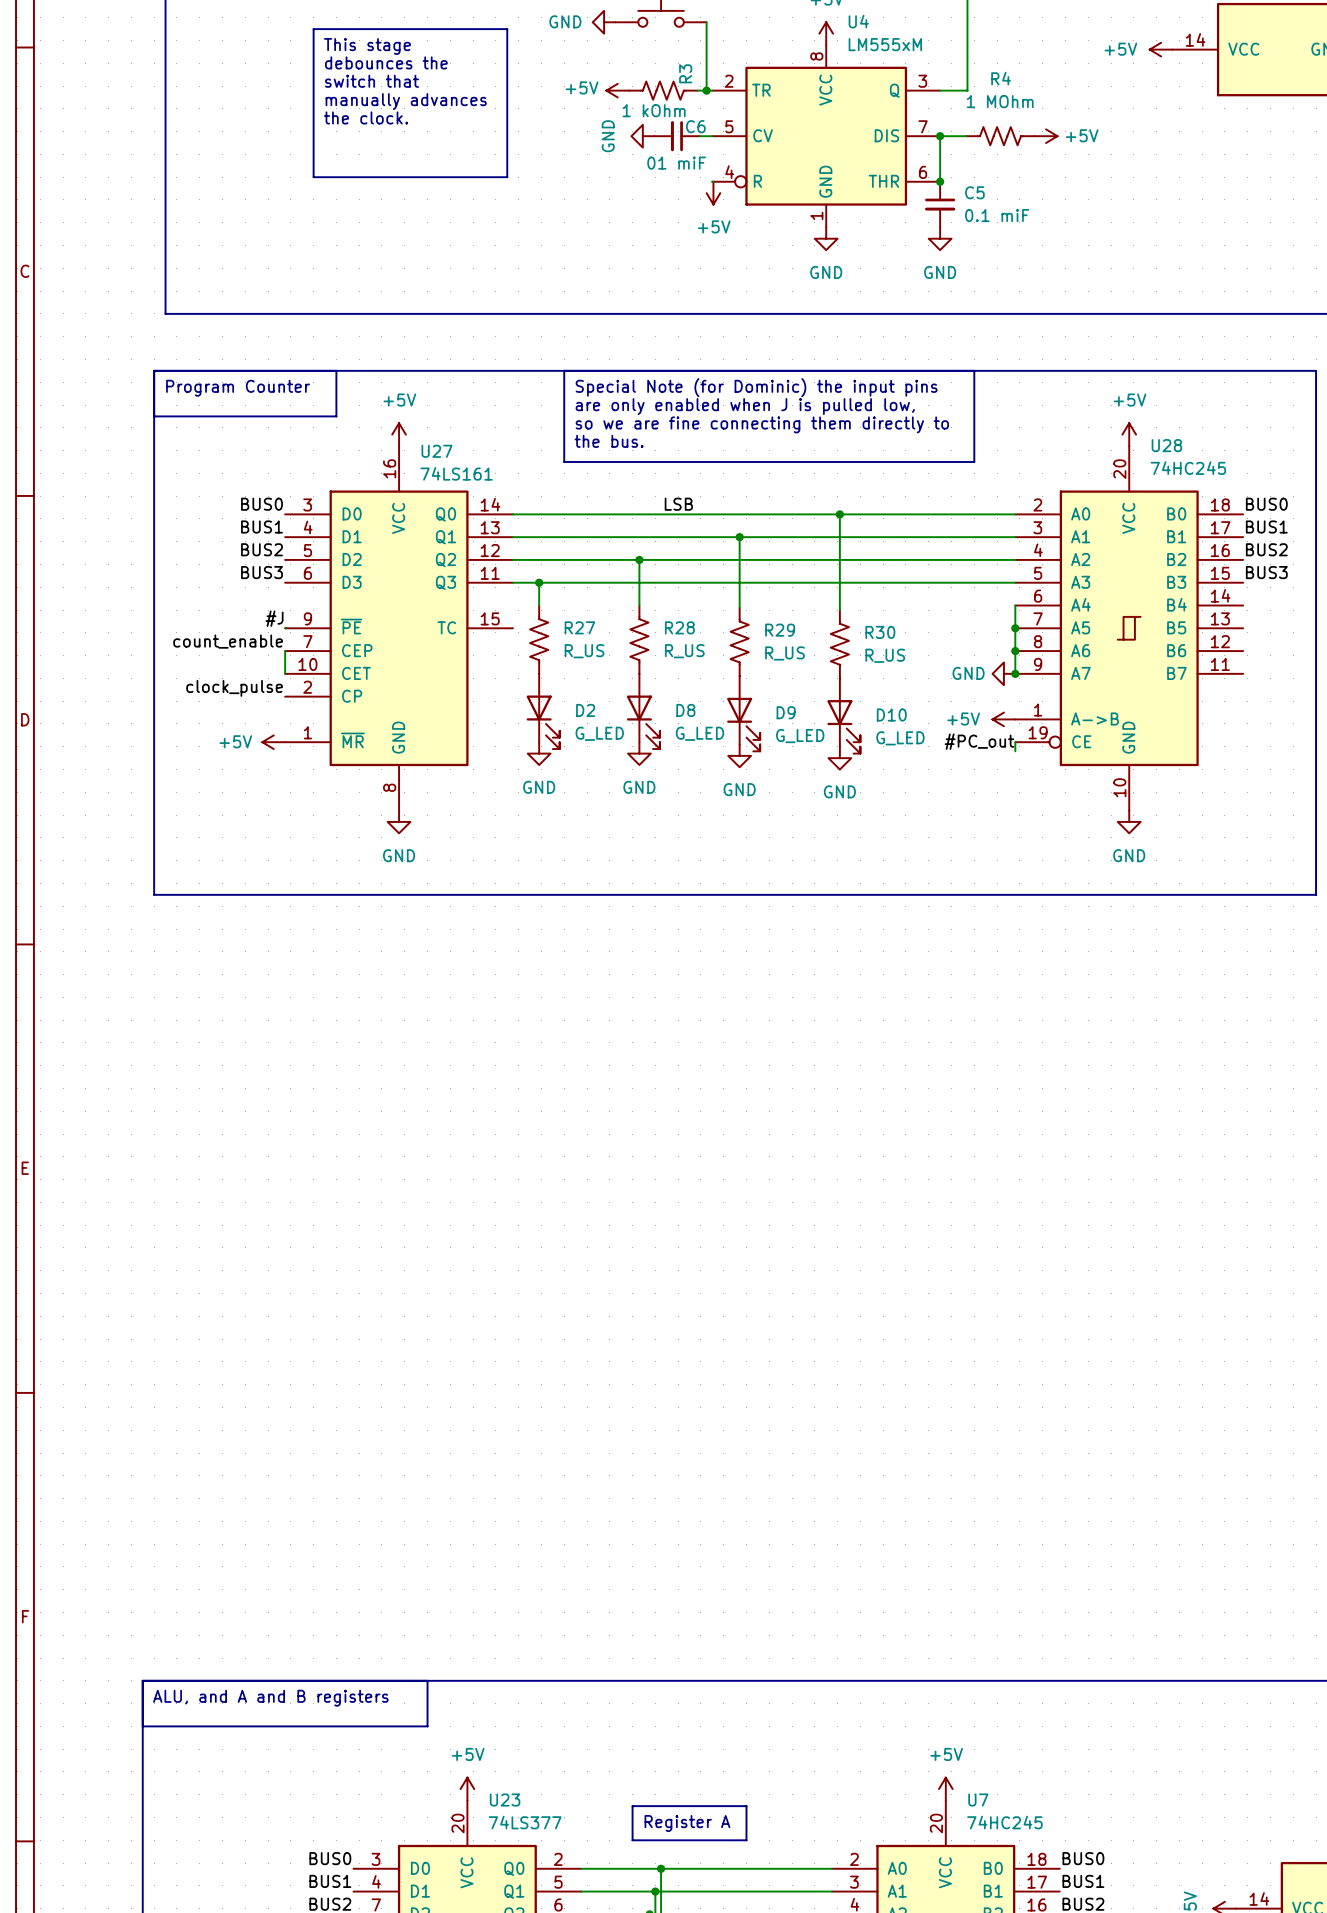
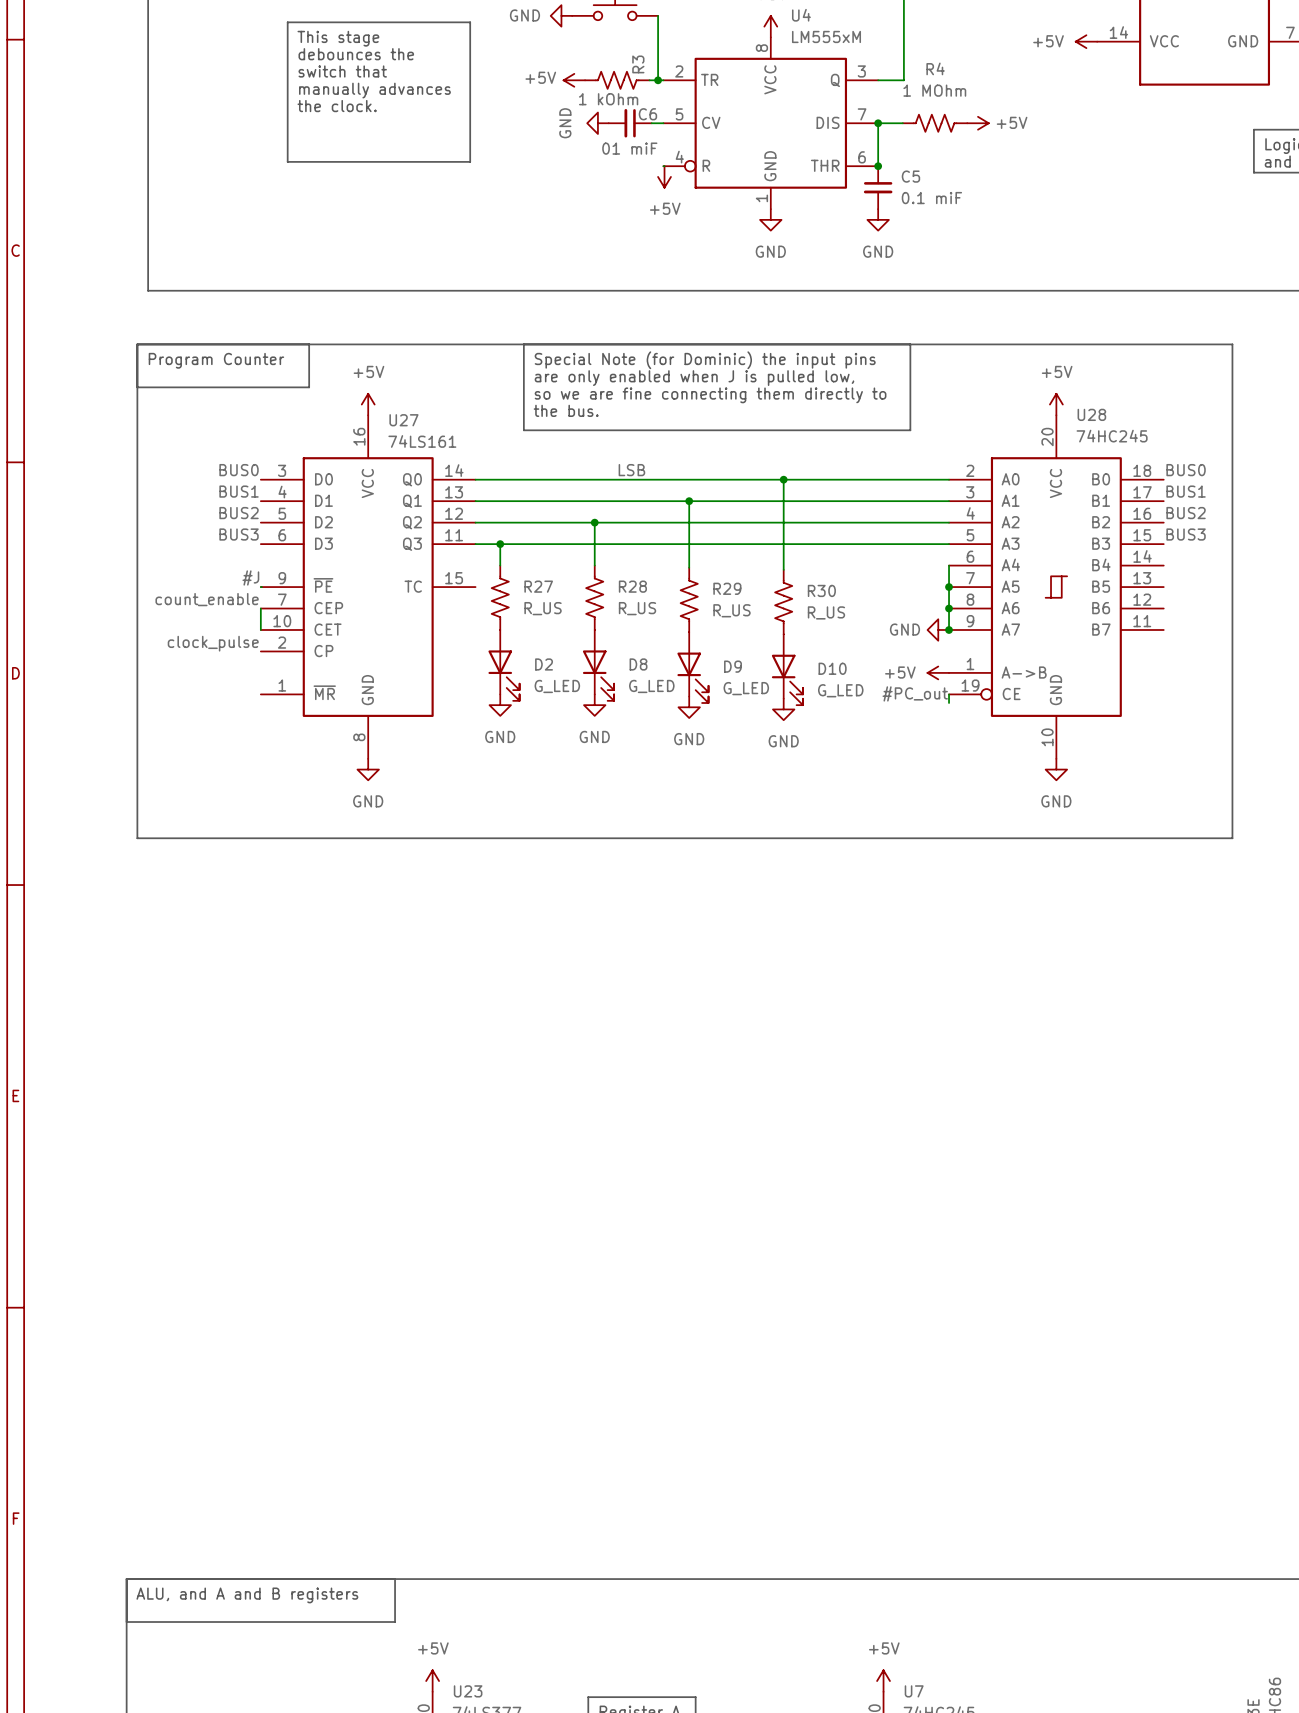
power symbol: +5V (273, 742) -> none

